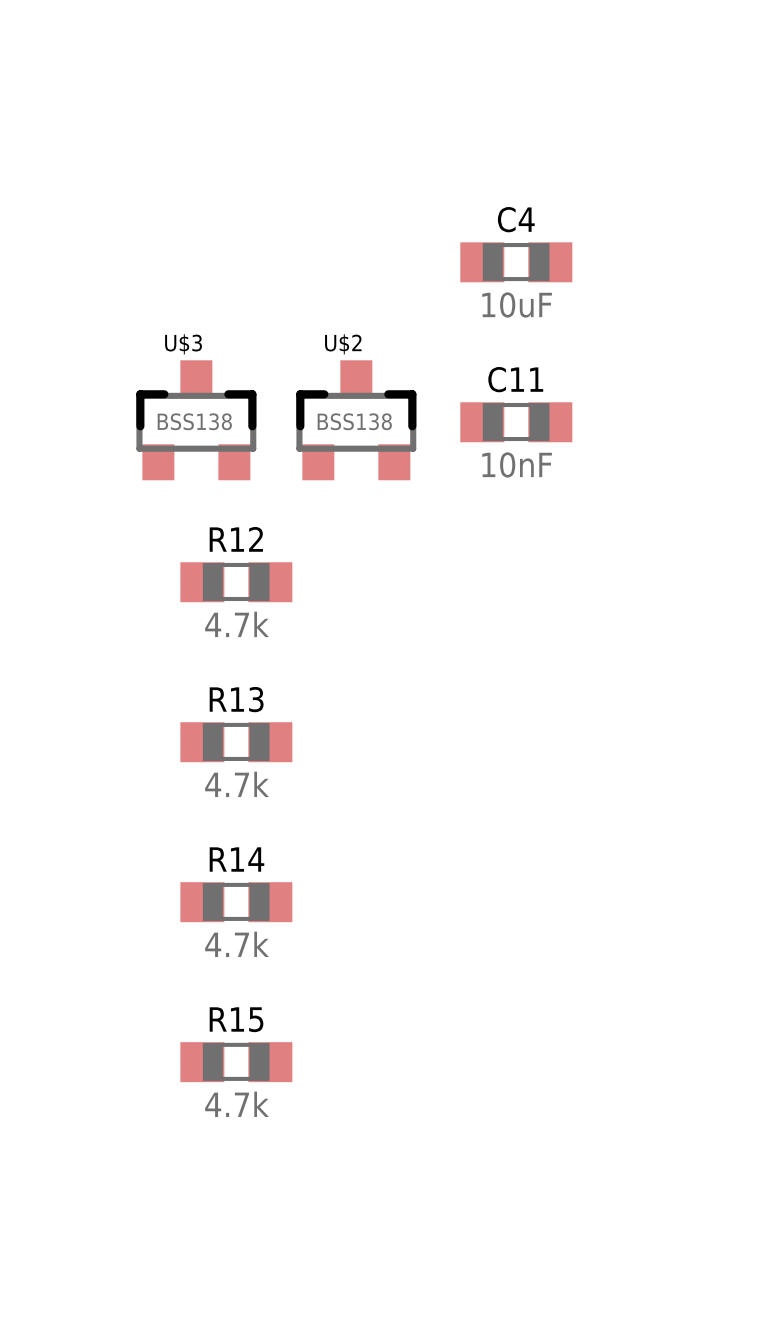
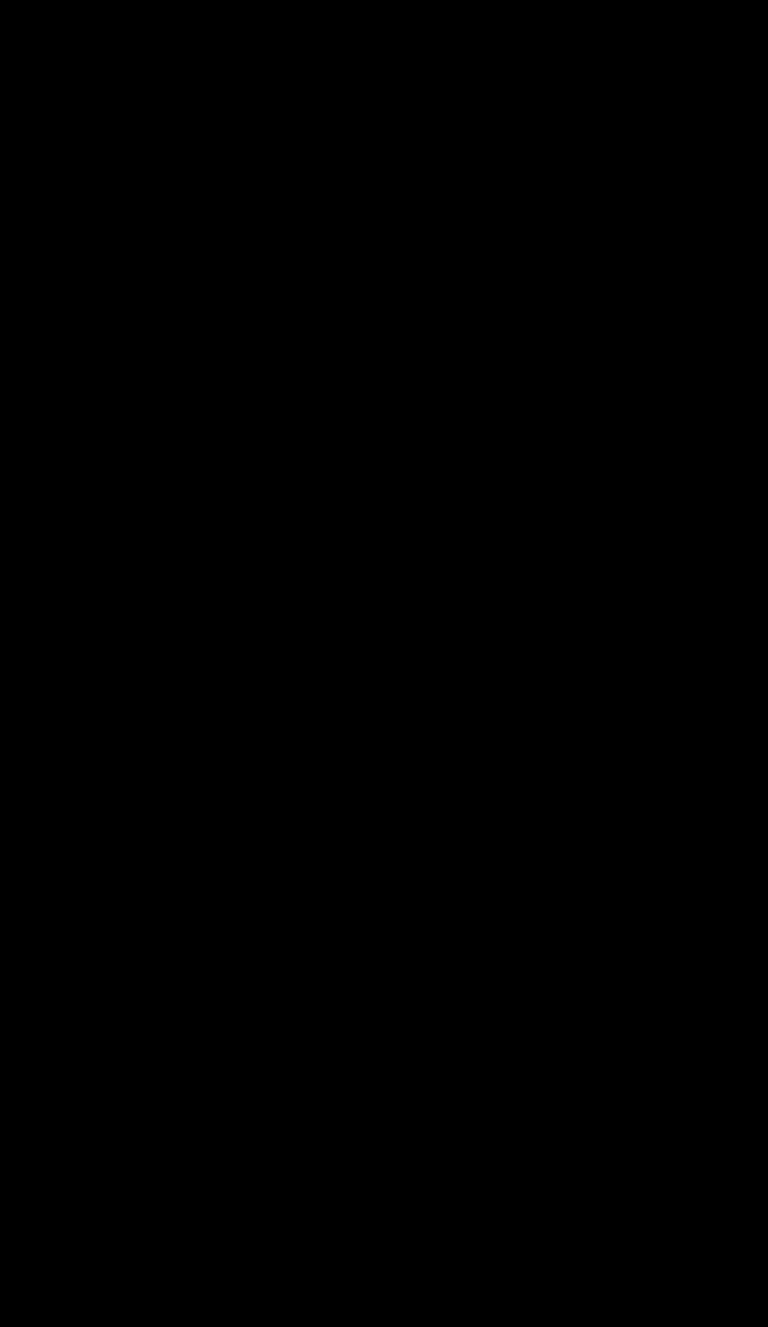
C4: 10uF (516, 262) -> none
U$3: BSS138 (196, 420) -> none
U$2: BSS138 (356, 420) -> none
C11: 10nF (516, 422) -> none
R12: 4.7k (236, 582) -> none
R13: 4.7k (236, 742) -> none
R14: 4.7k (236, 902) -> none
R15: 4.7k (236, 1062) -> none

